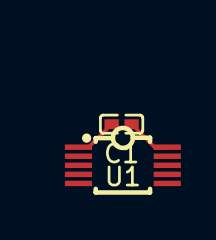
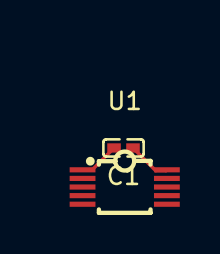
U1 name position: U1 (123, 175) -> U1 (125, 100)

